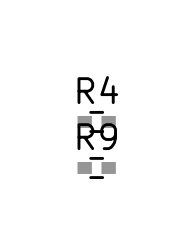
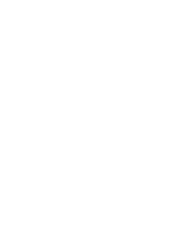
R4: (96, 121) -> none
R9: (96, 167) -> none

